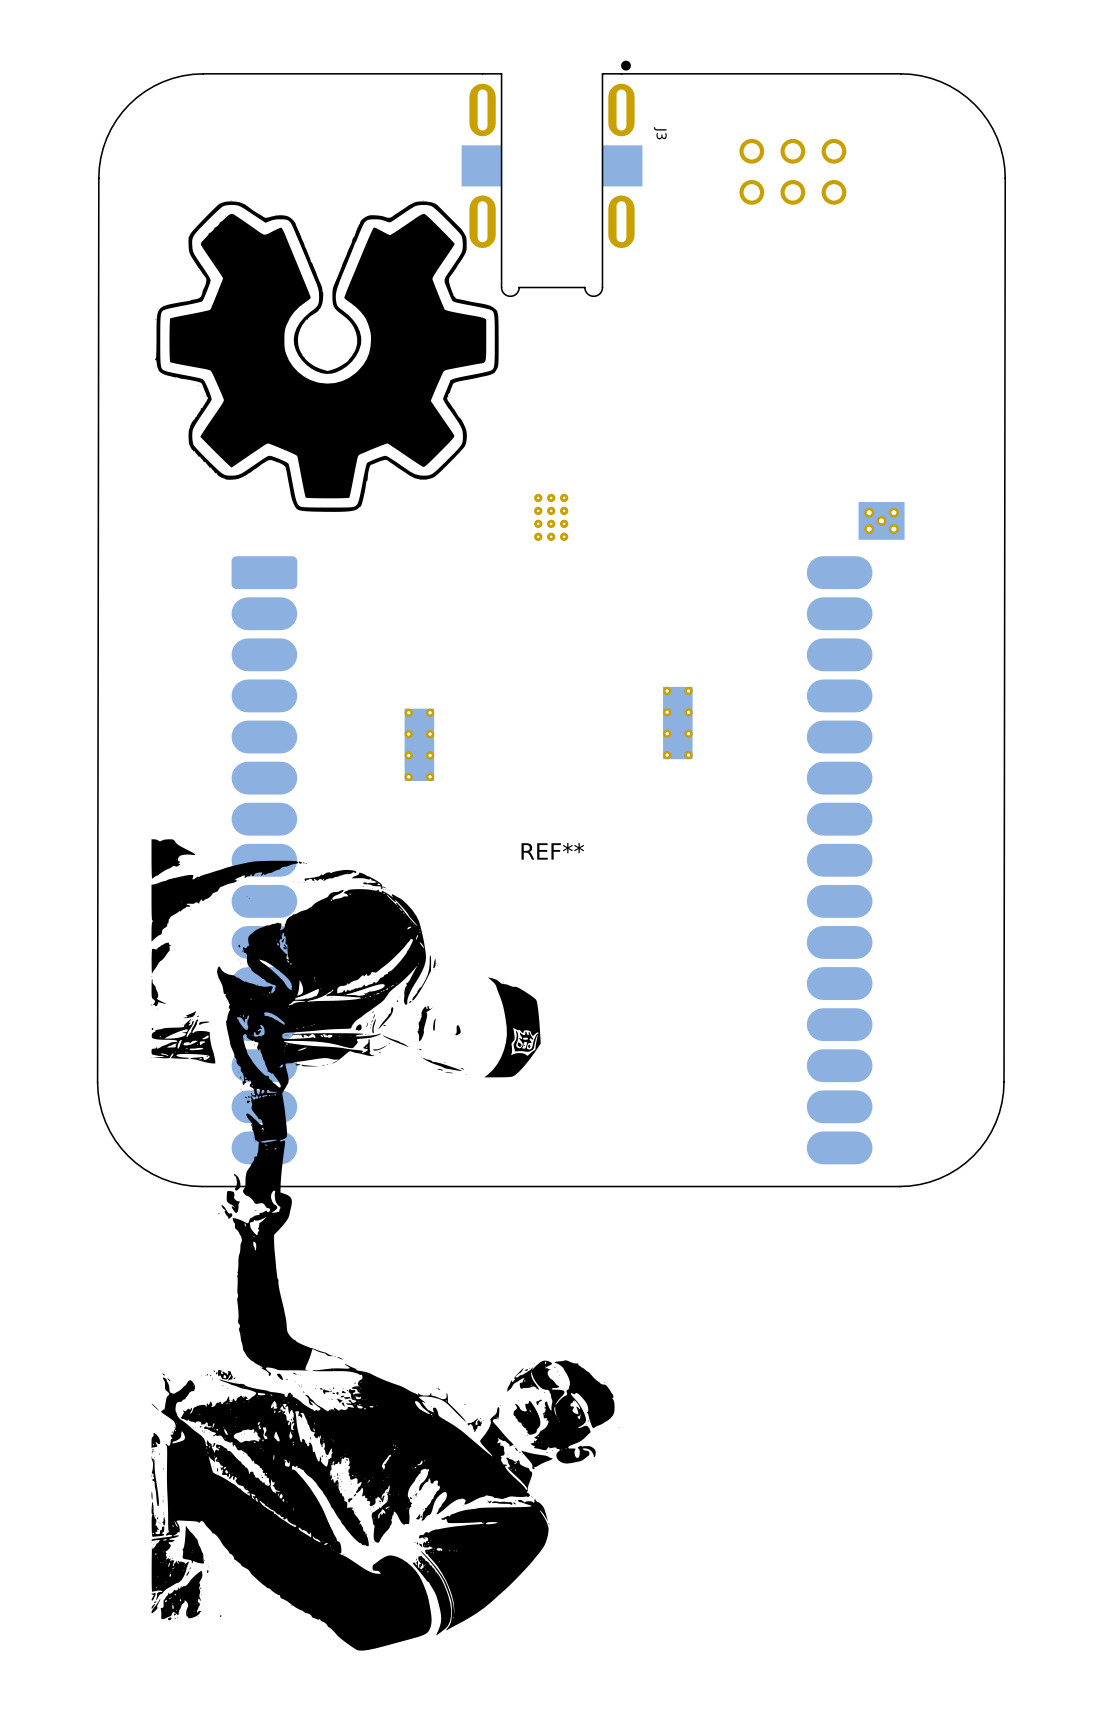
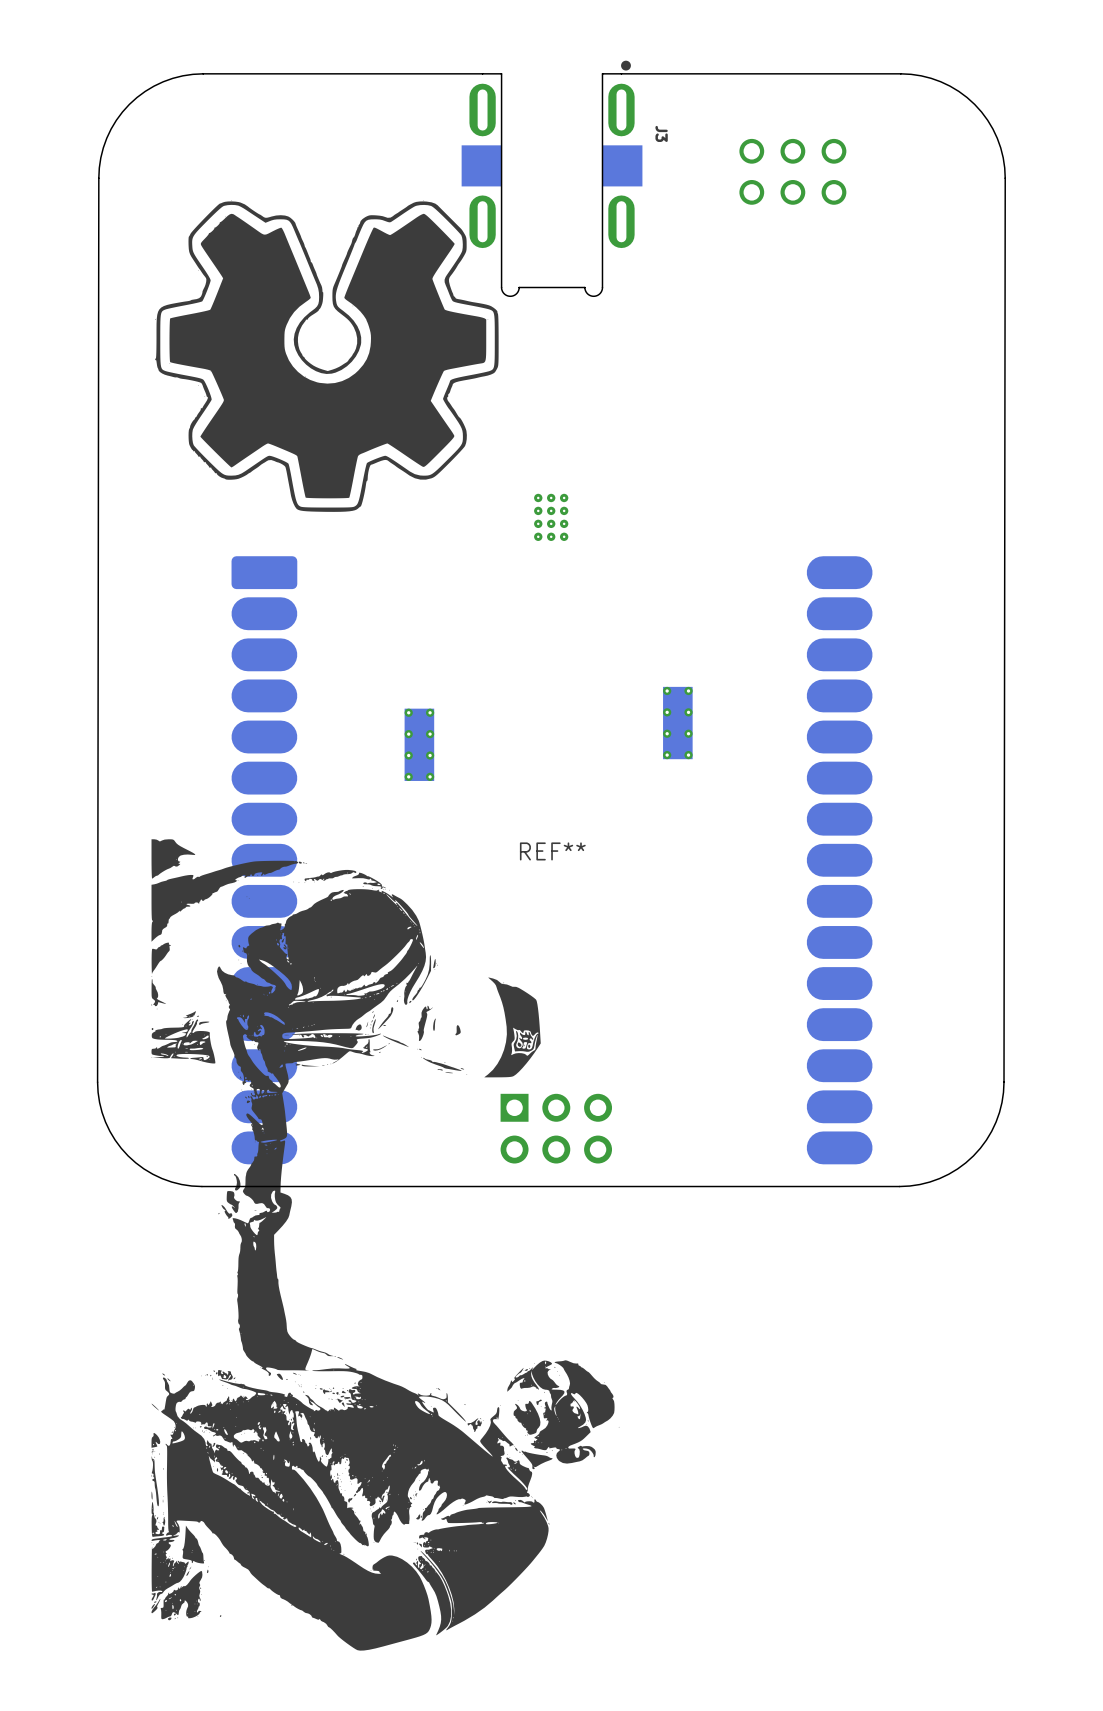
part: (881, 520) -> none
part: none -> (556, 1128)

